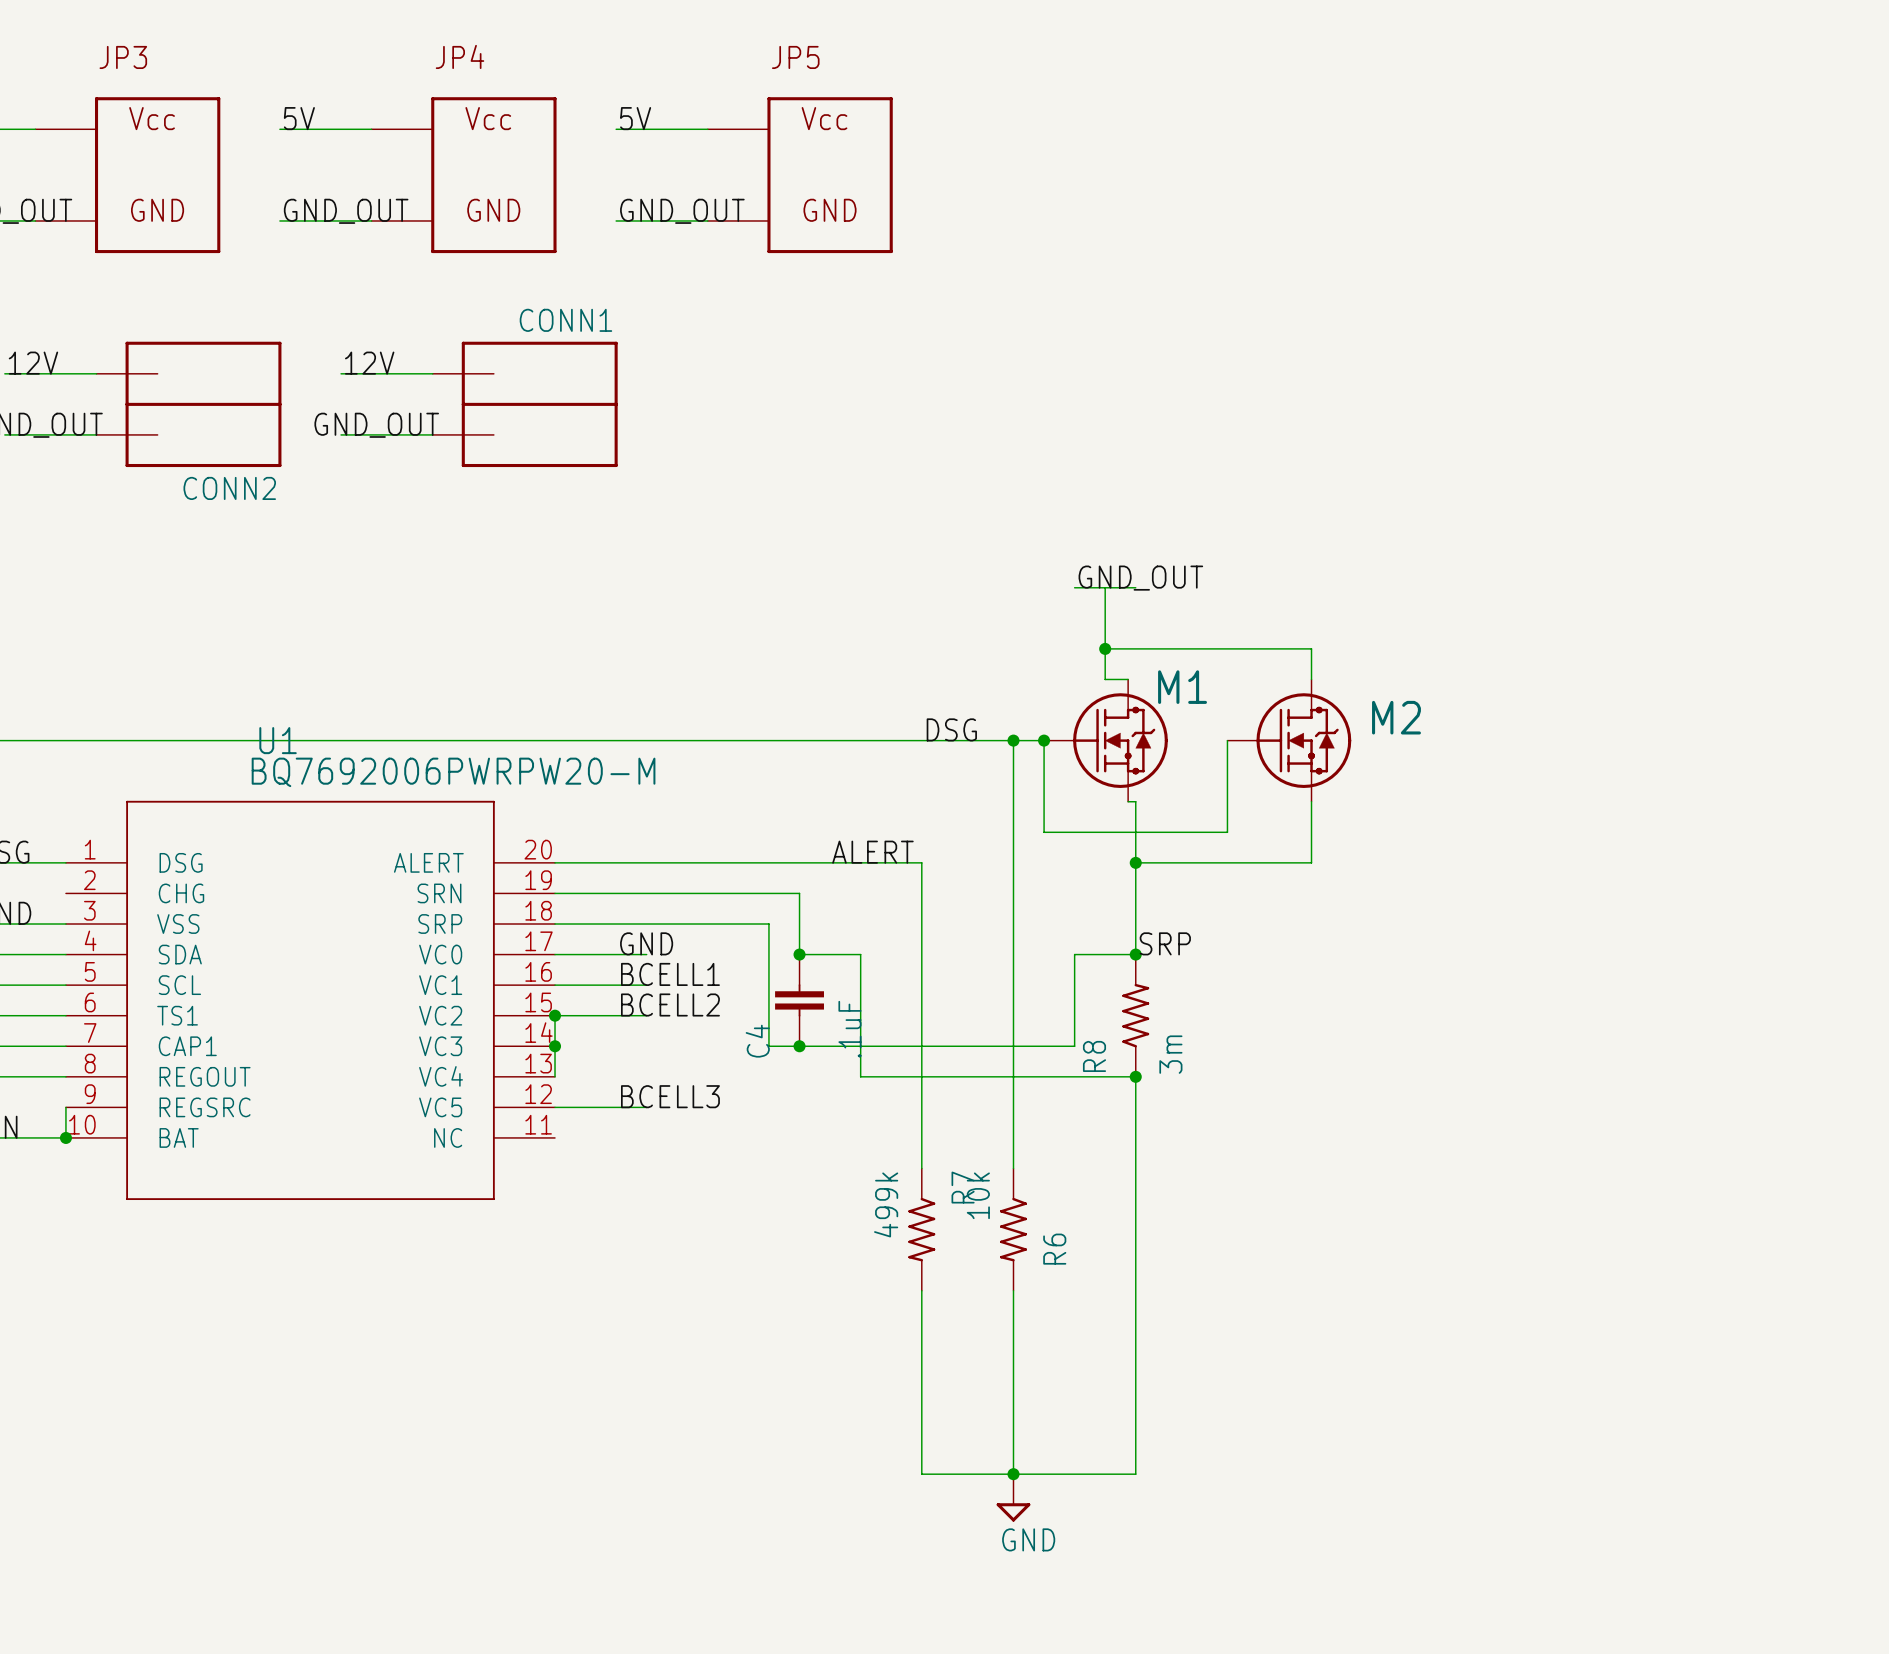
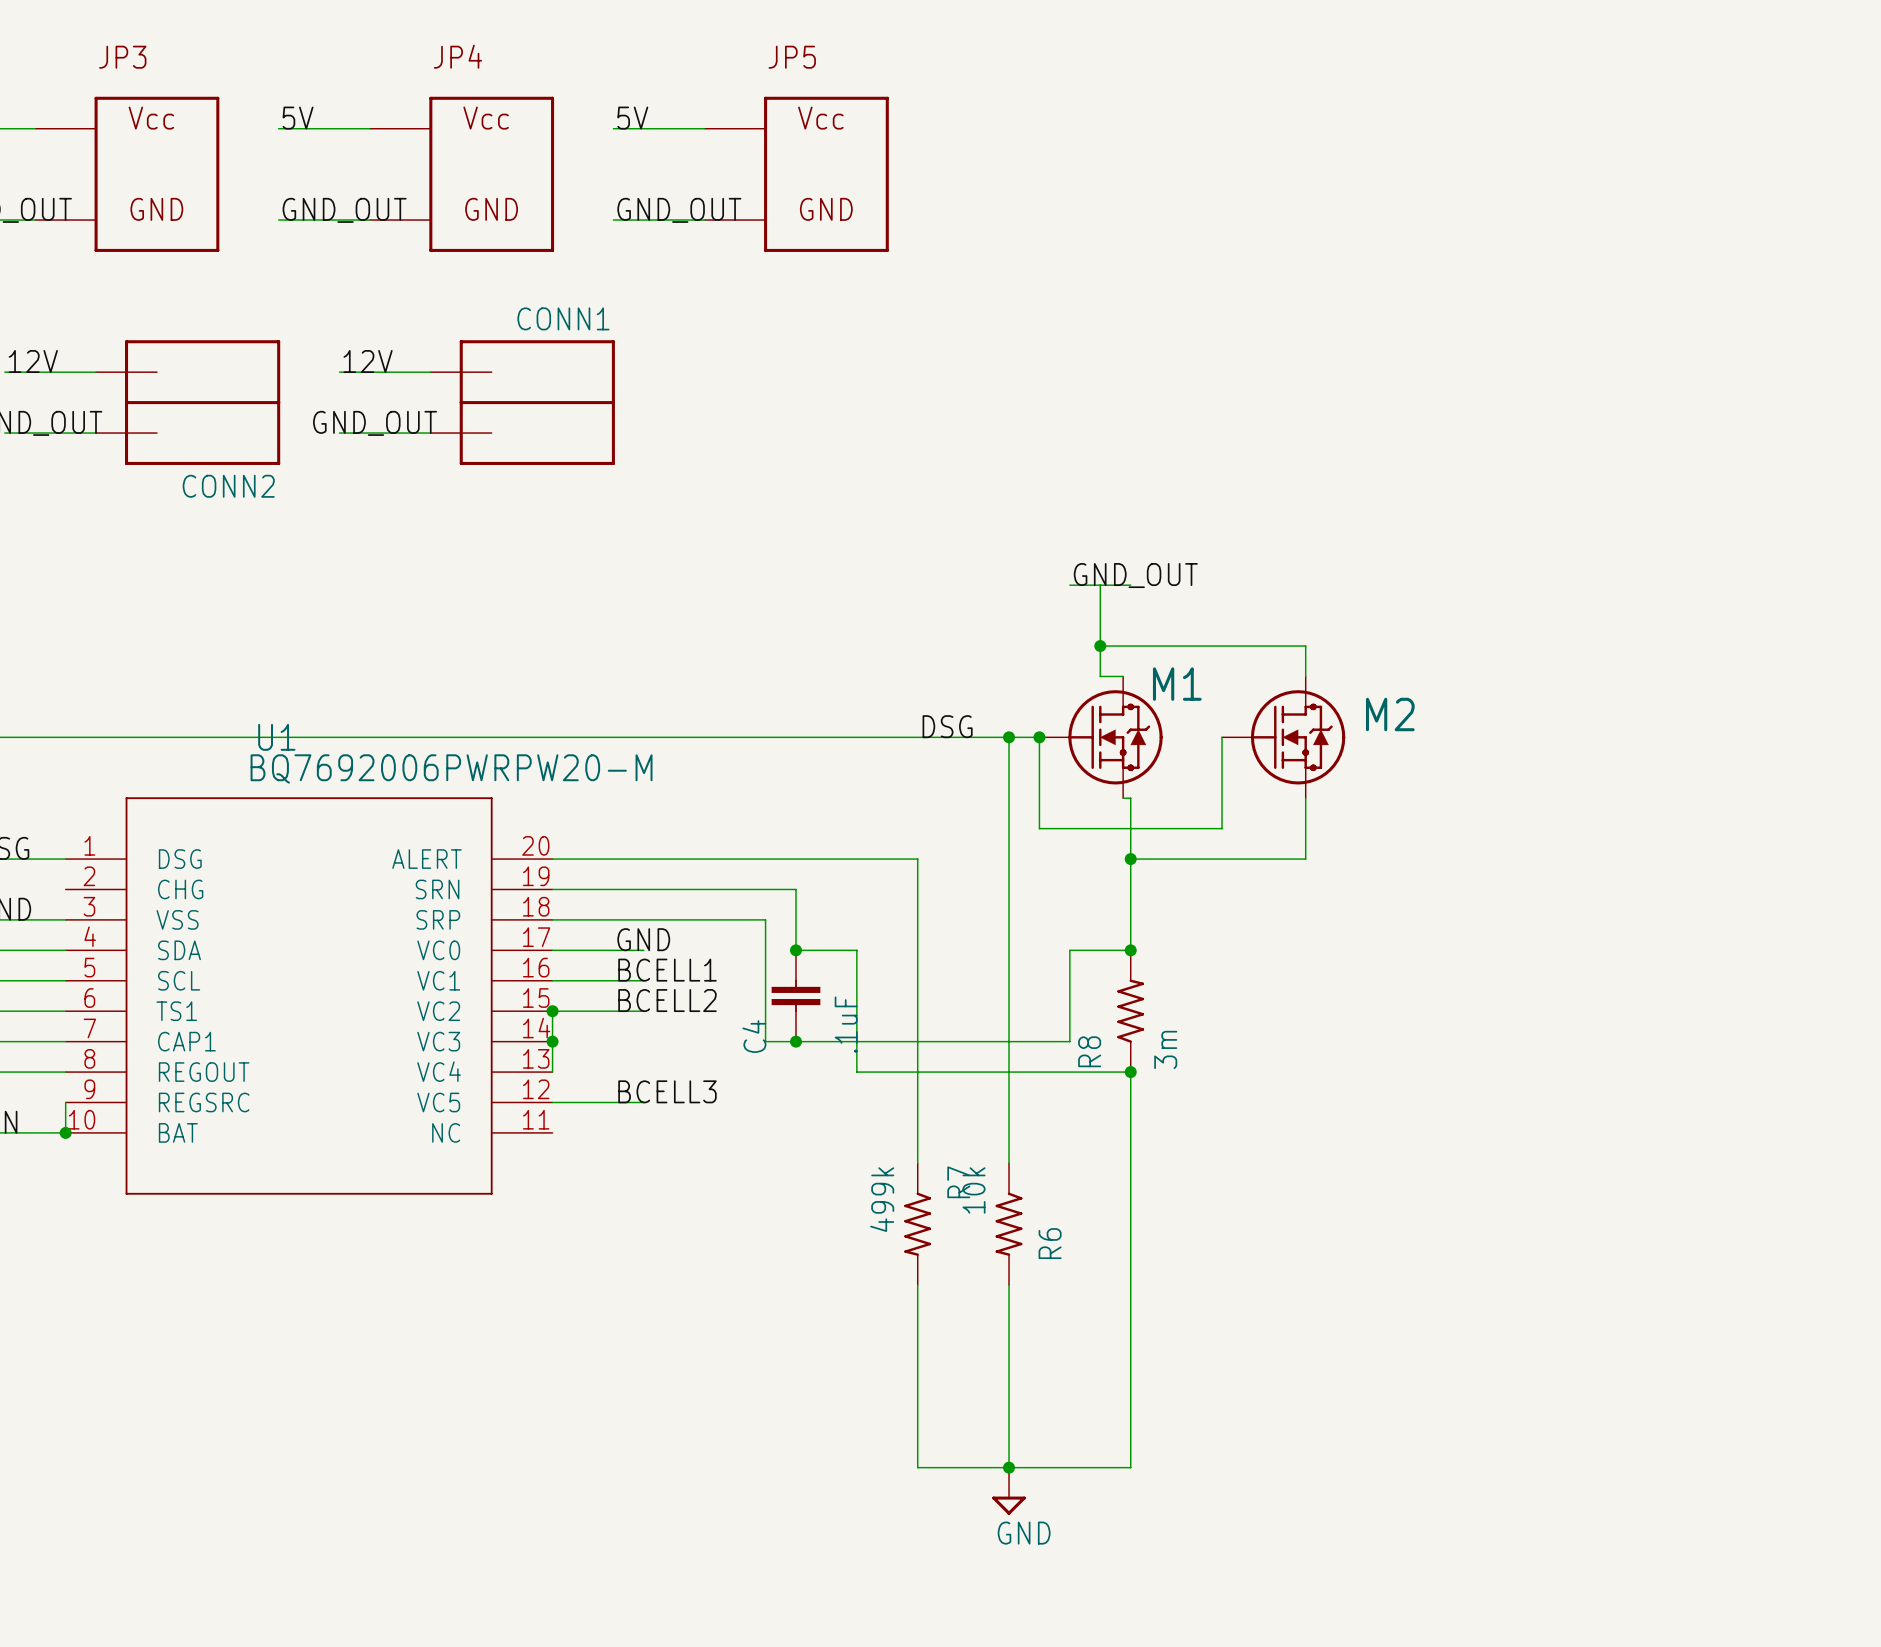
label: ALERT (872, 852) -> none
label: SRP (1165, 943) -> none

